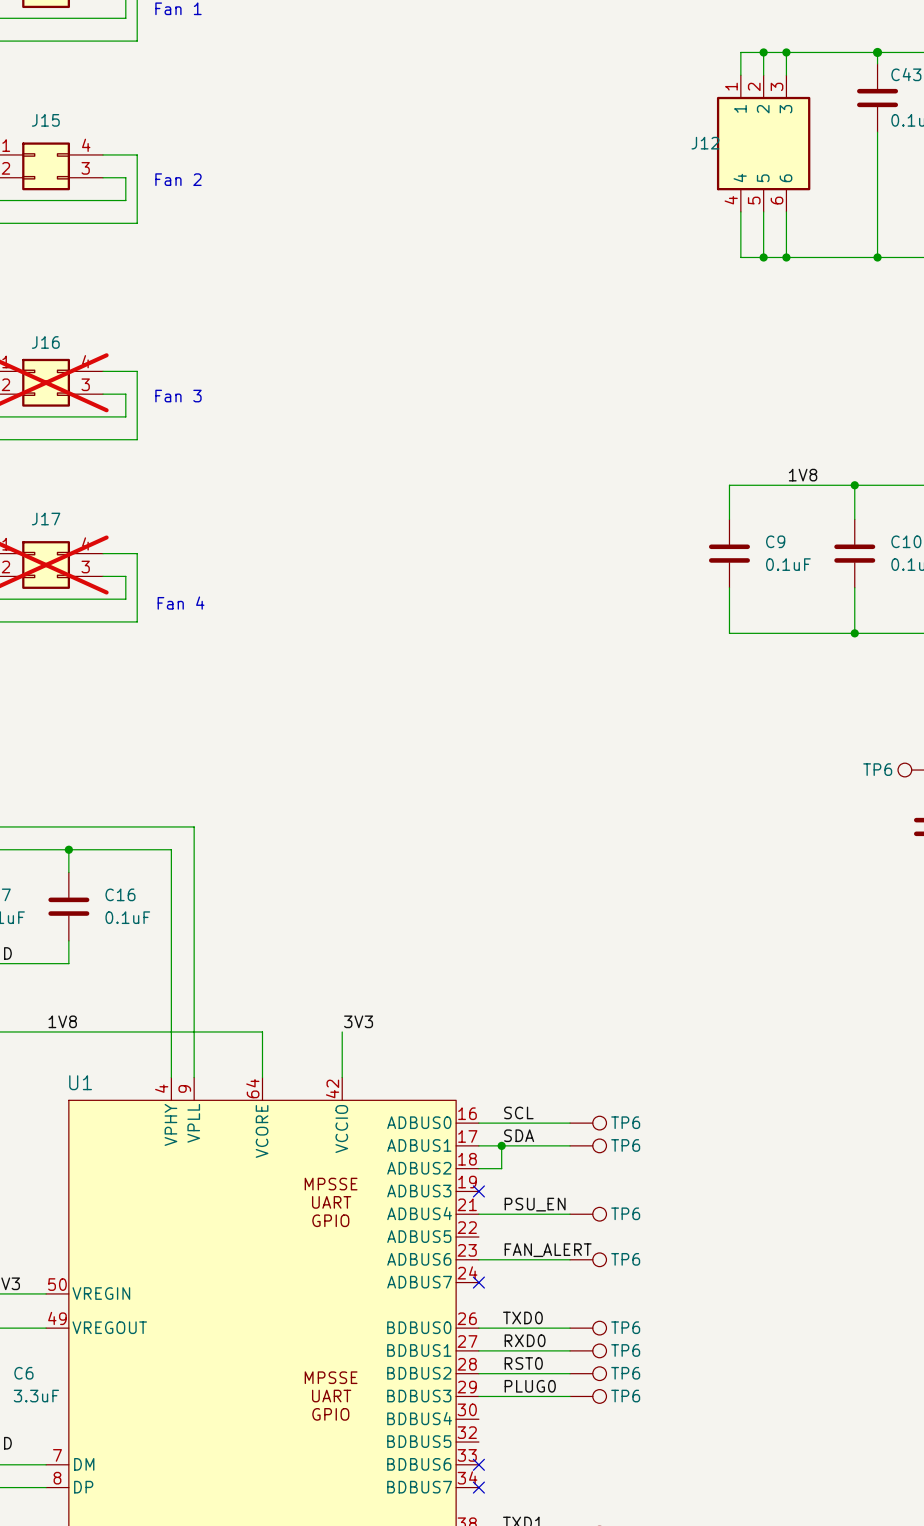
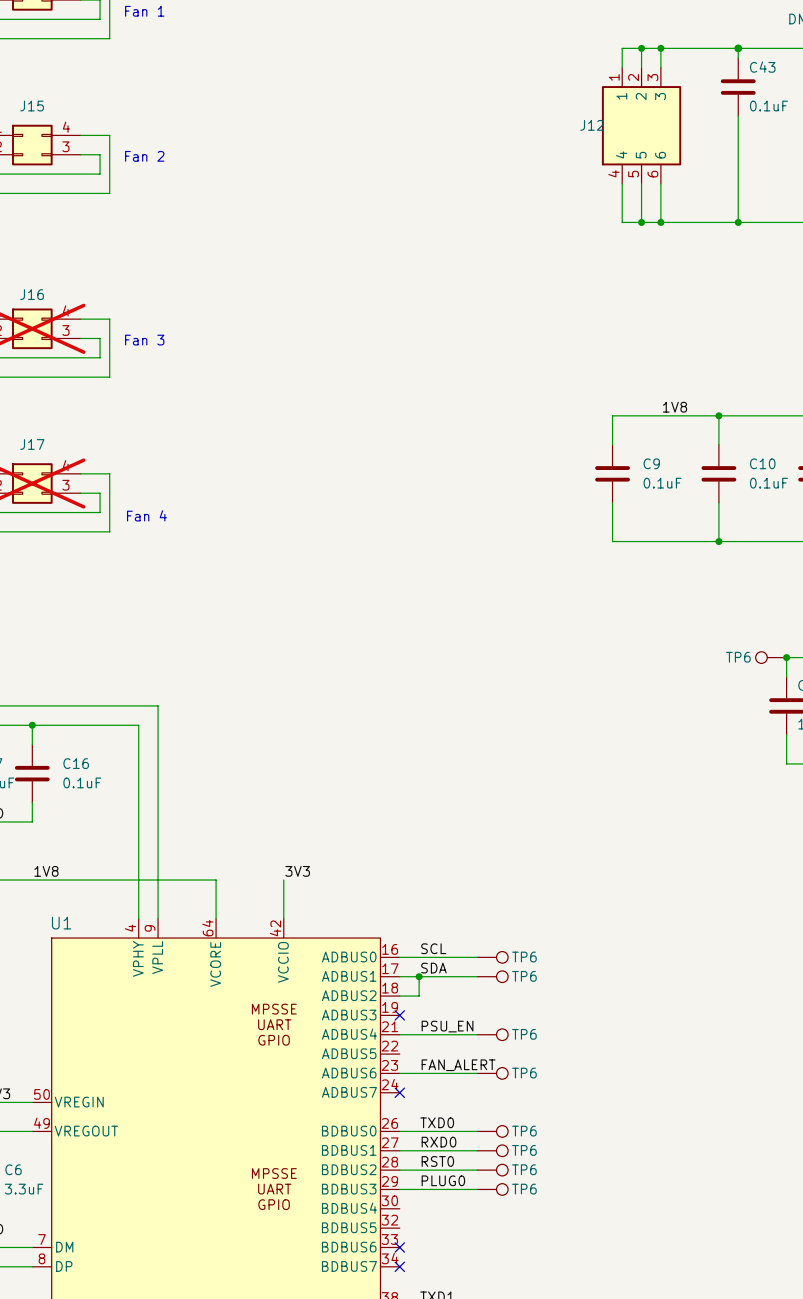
wire: (68, 849) (68, 872) -> (32, 725) (32, 744)
junction position: (68, 849) -> (32, 725)
C16 position: (68, 906) -> (32, 773)
wire: (68, 940) (68, 963) (46, 963) -> (32, 802) (32, 821)

